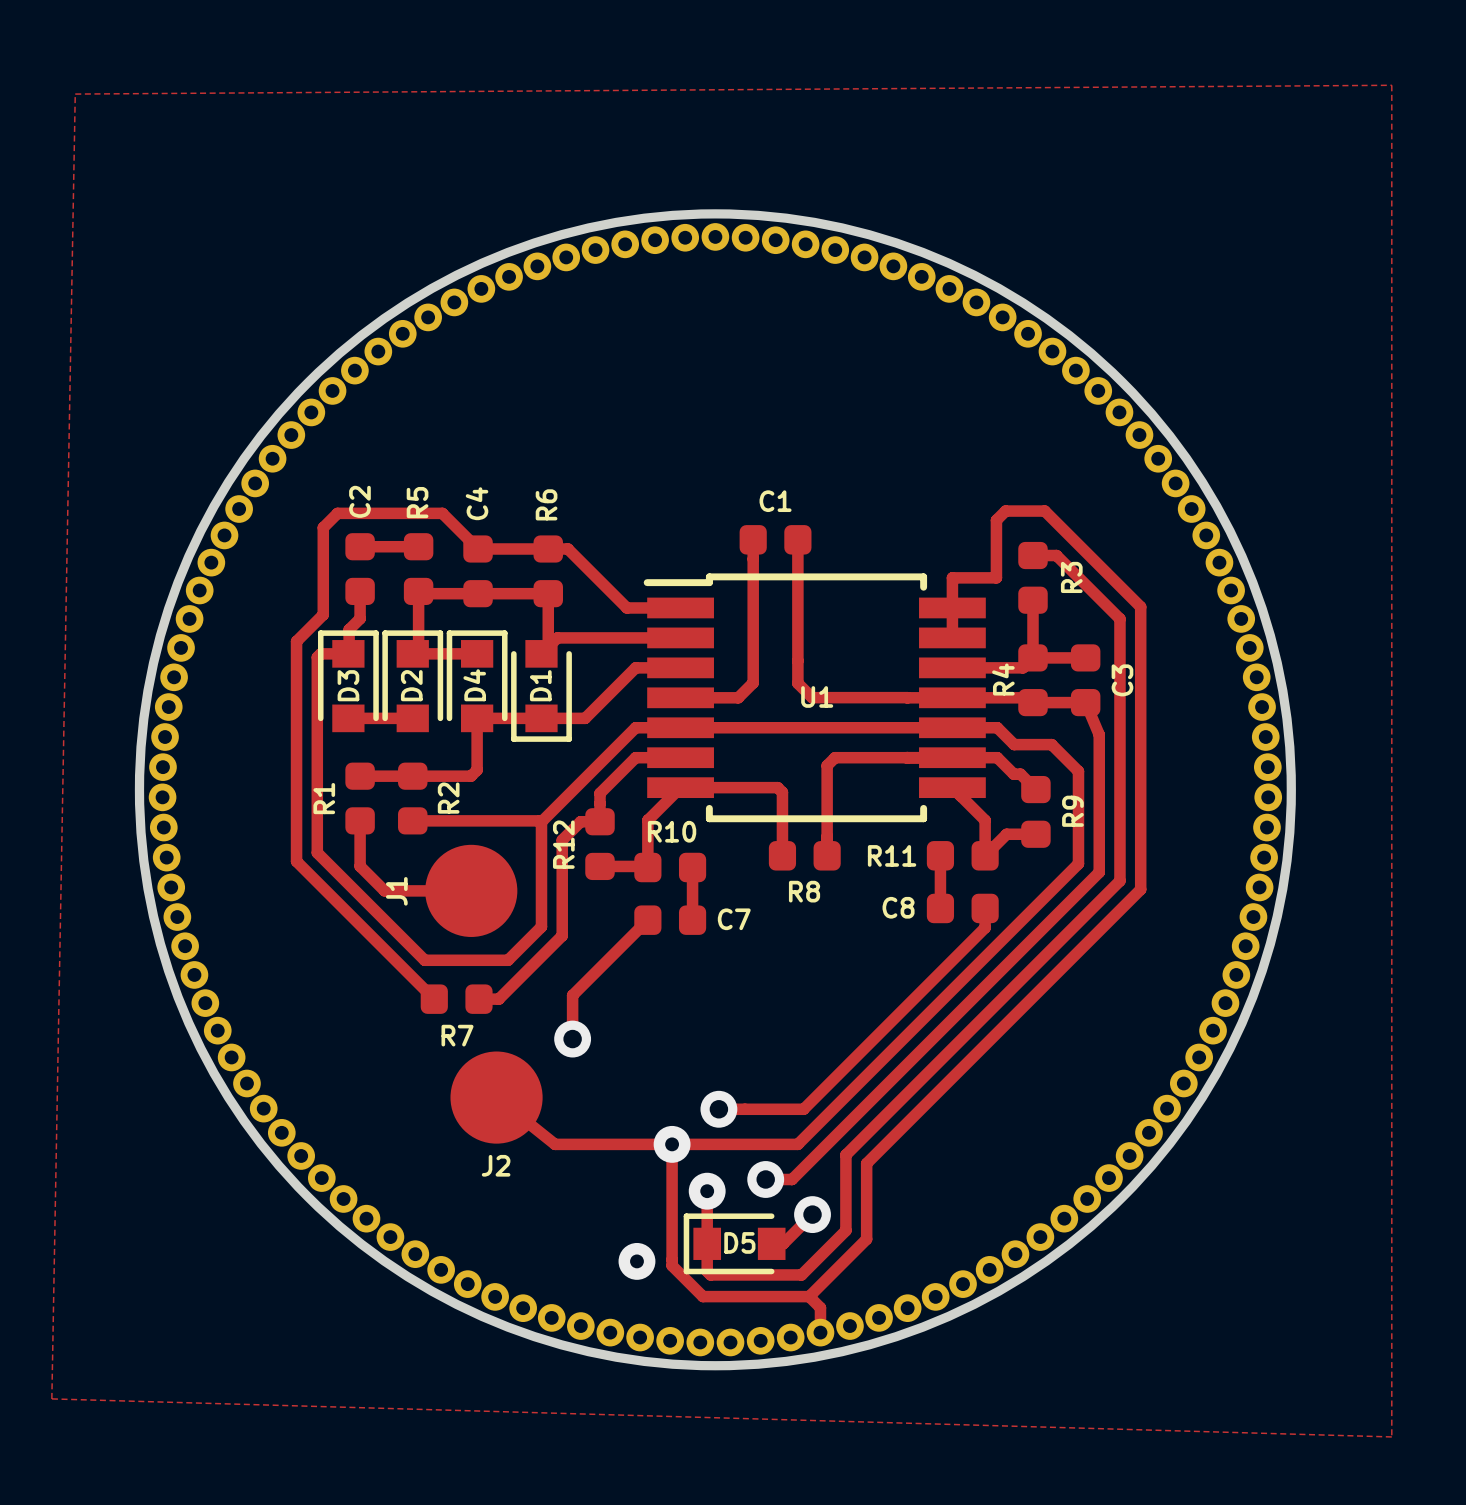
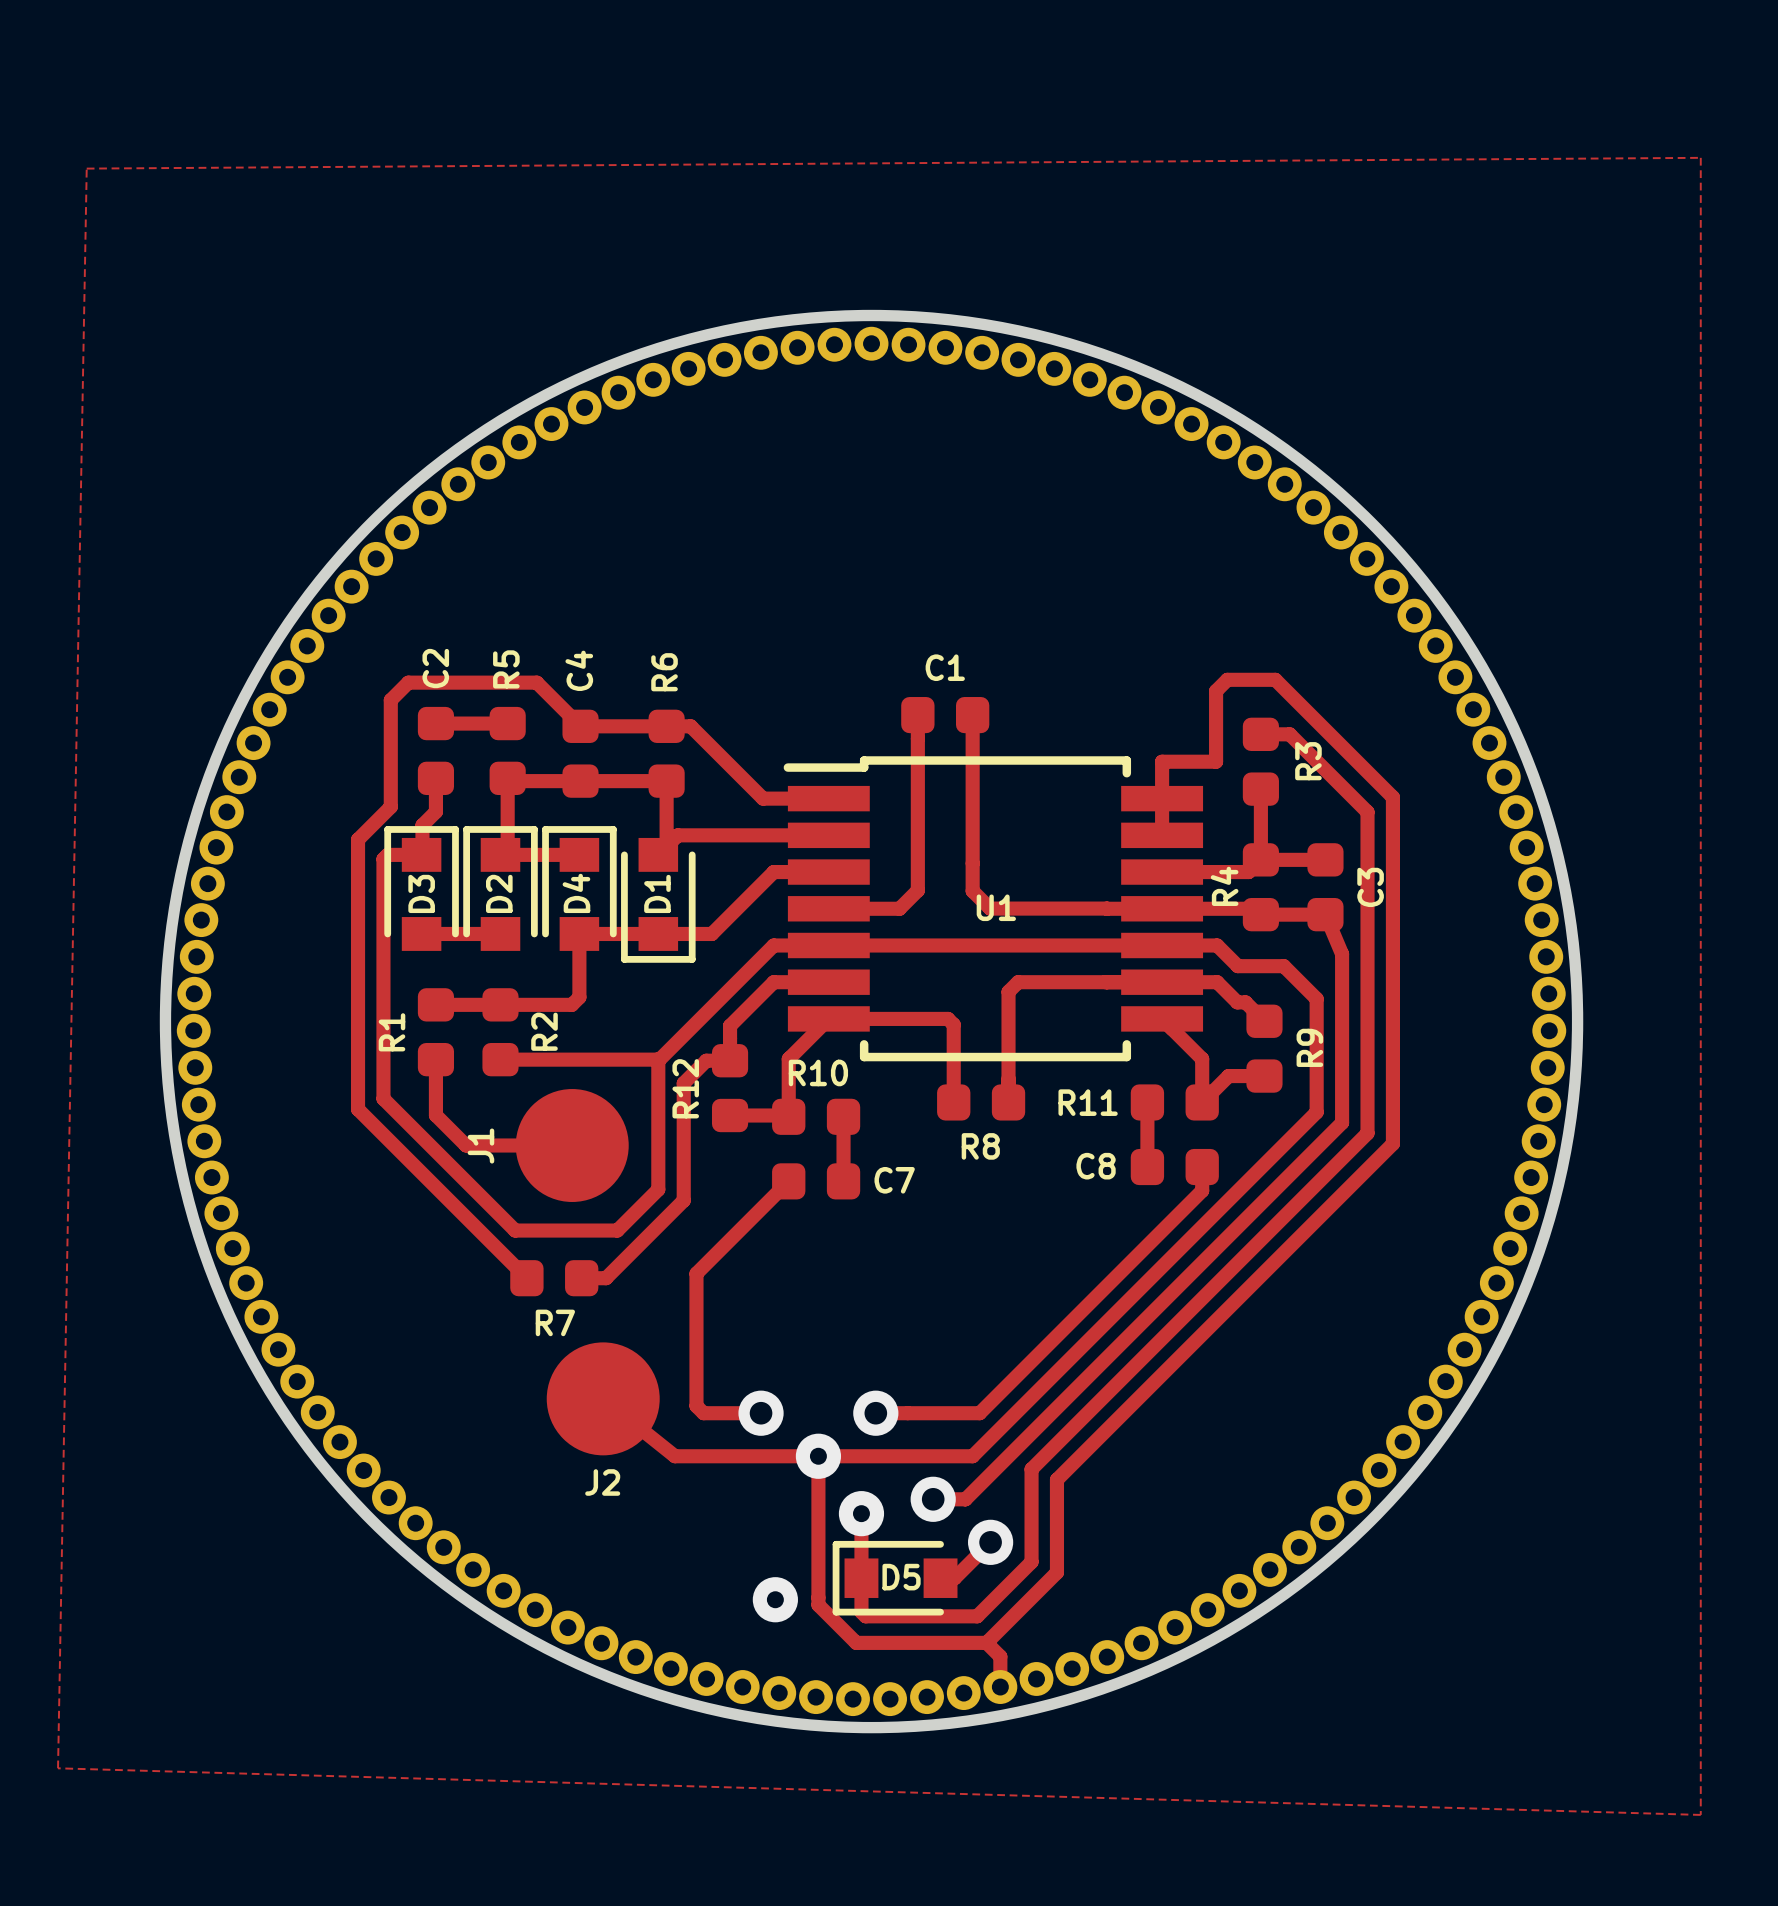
track: none -> (696, 1327) (696, 1406) (703, 1413) (761, 1413)
via position: (572, 1039) -> (761, 1413)

